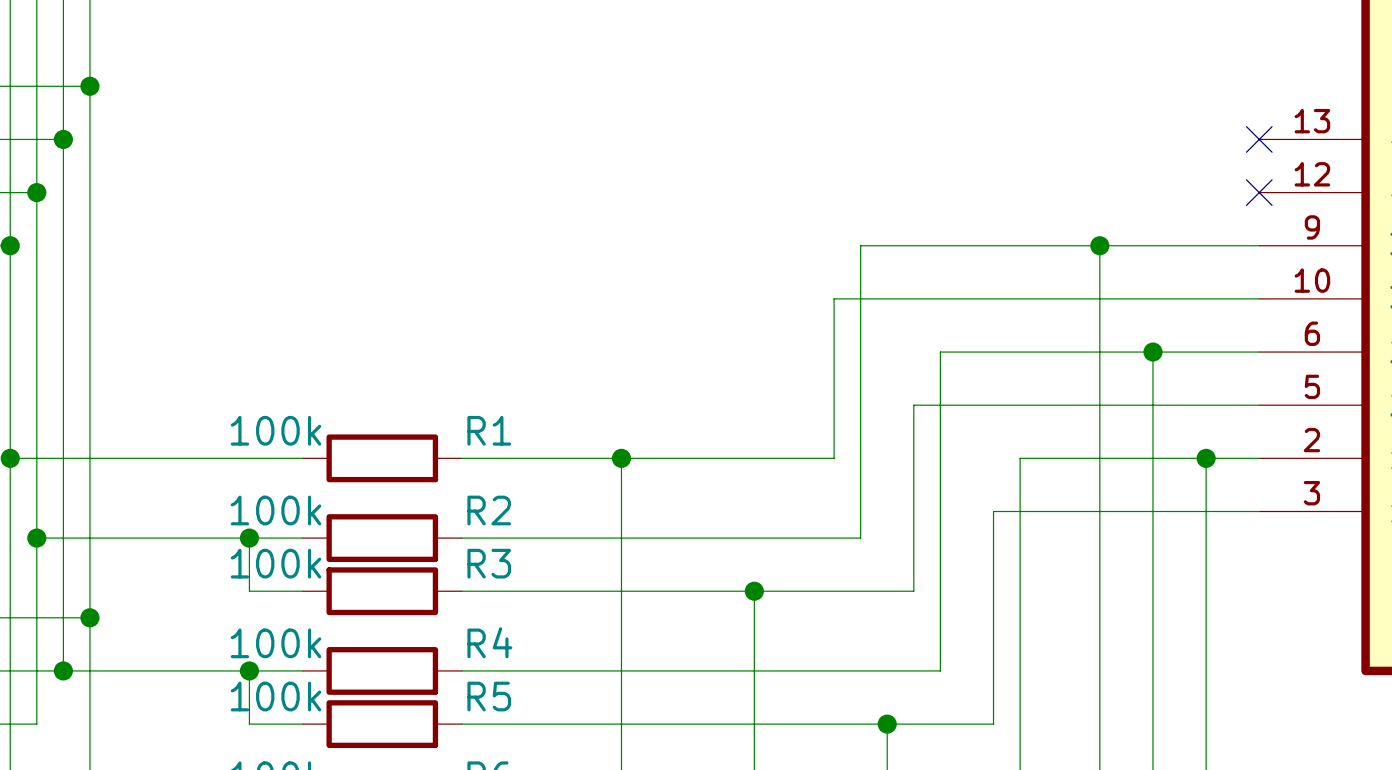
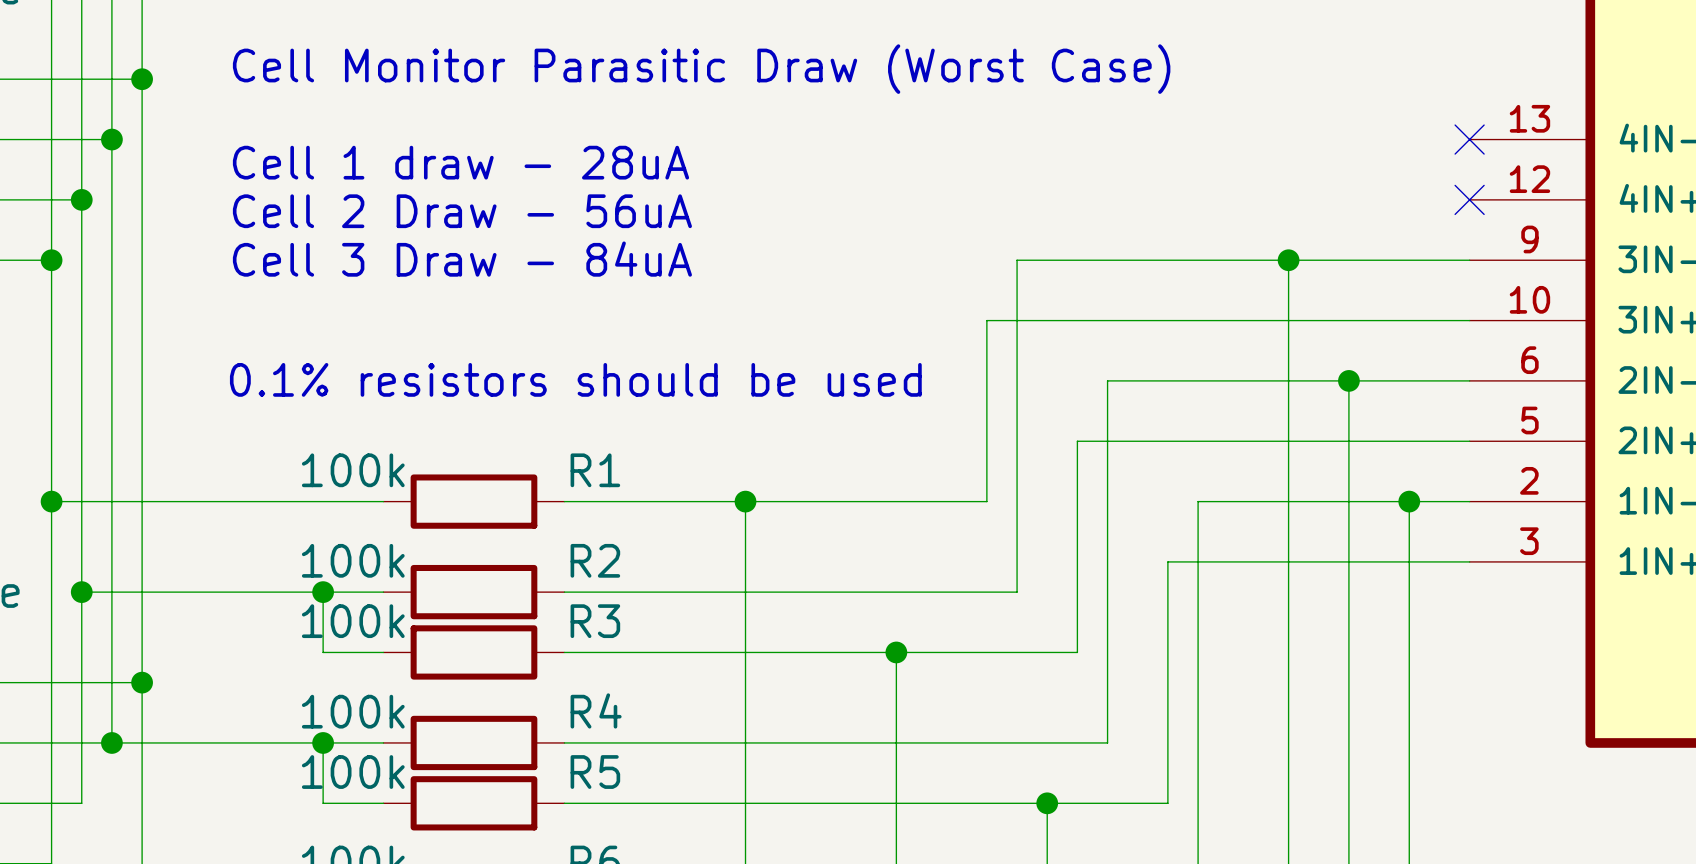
text: none -> Cell Monitor Parasitic Draw (Worst Case) (701, 69)
text: none -> Cell 1 draw - 28uA (460, 162)
text: none -> Cell 2 Draw - 56uA (462, 211)
text: none -> Cell 3 Draw - 84uA (462, 259)
text: none -> 0.1% resistors should be used (575, 379)

